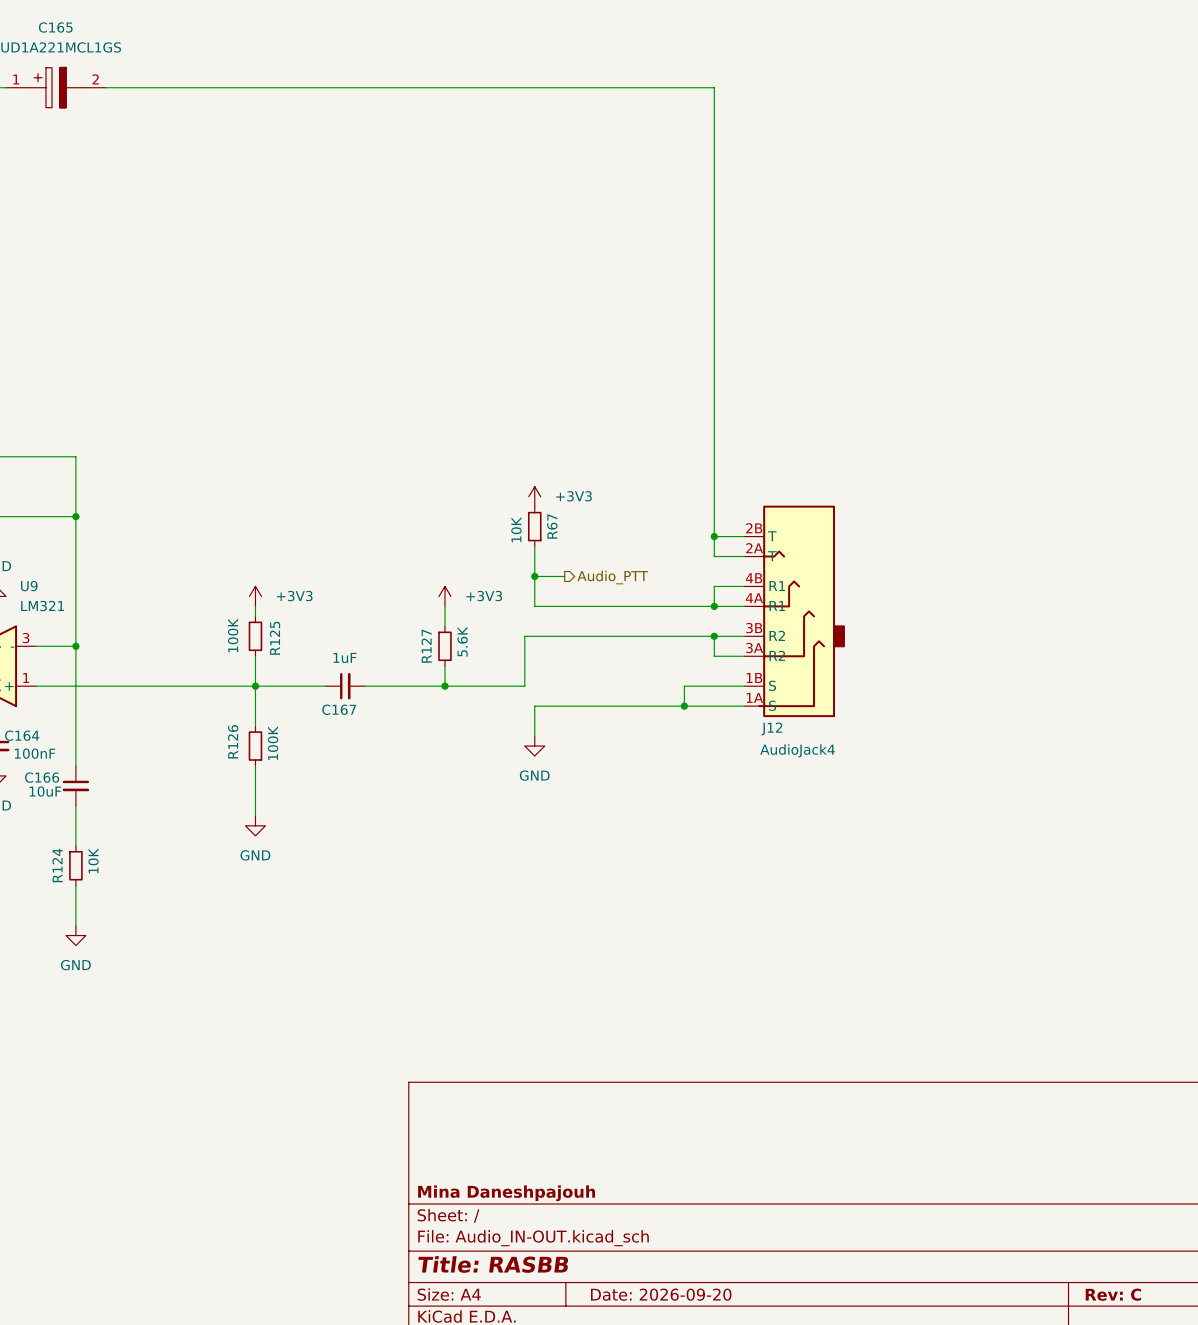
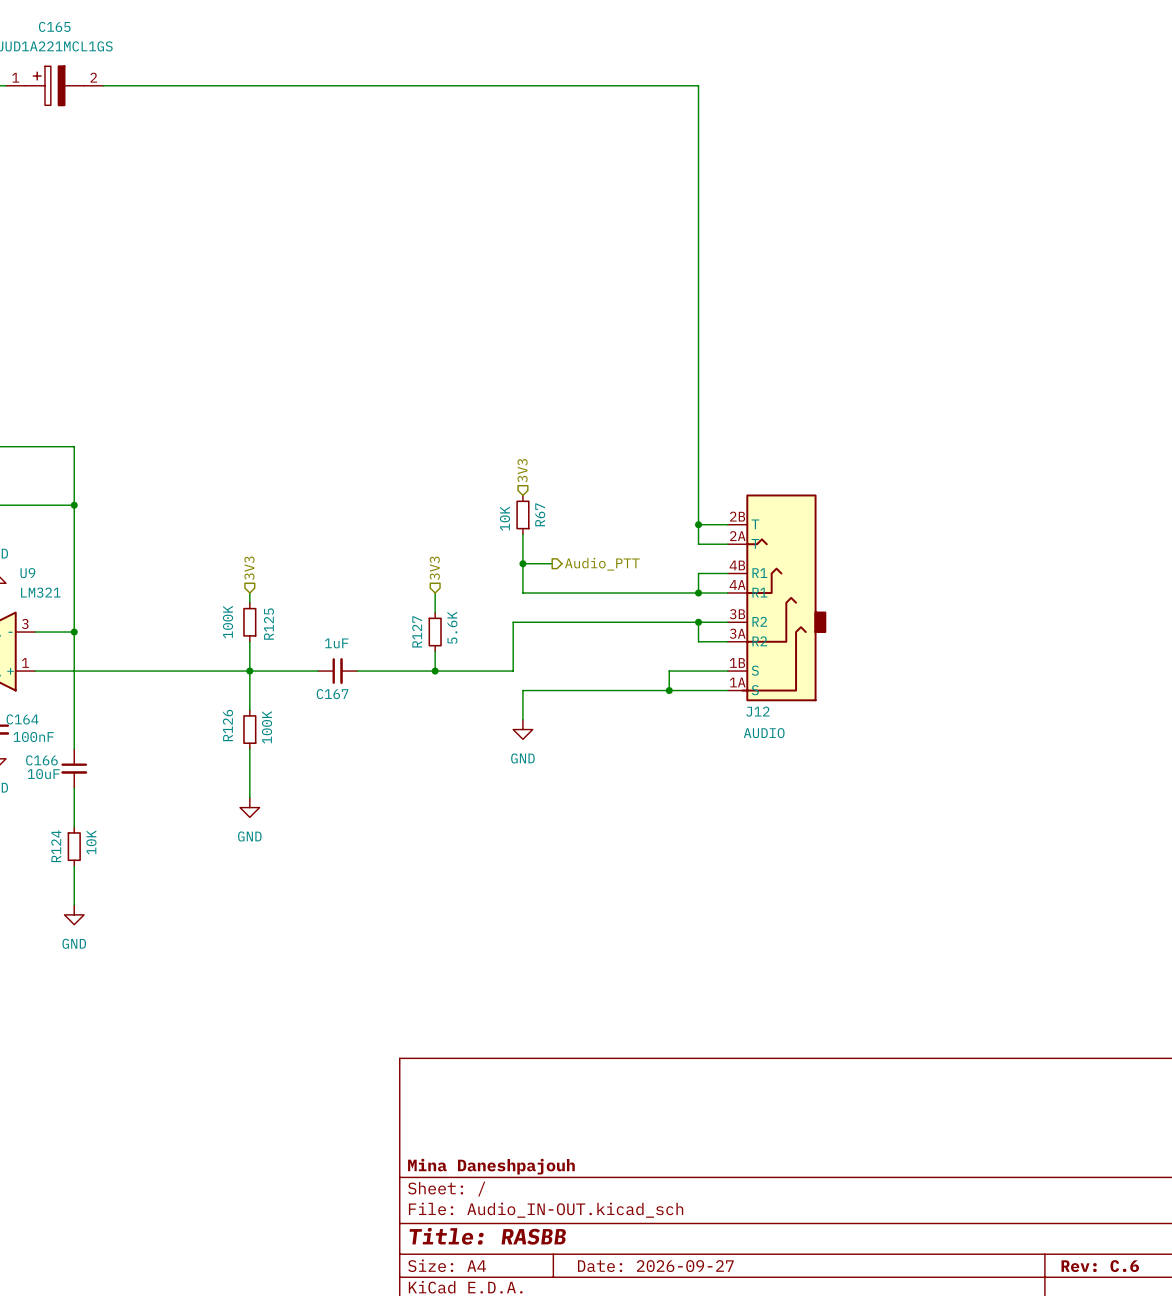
hierarchical label: none -> 3V3 (522, 470)
power symbol: +3V3 (534, 496) -> none
hierarchical label: none -> 3V3 (249, 568)
hierarchical label: none -> 3V3 (434, 568)
power symbol: +3V3 (255, 596) -> none
power symbol: +3V3 (444, 596) -> none
J12 value: AudioJack4 (797, 750) -> AUDIO (764, 733)
title block: Date: 2026-09-20 (661, 1294) -> Date: 2026-09-27 (655, 1266)
title block: Rev: C (1113, 1294) -> Rev: C.6 (1100, 1266)

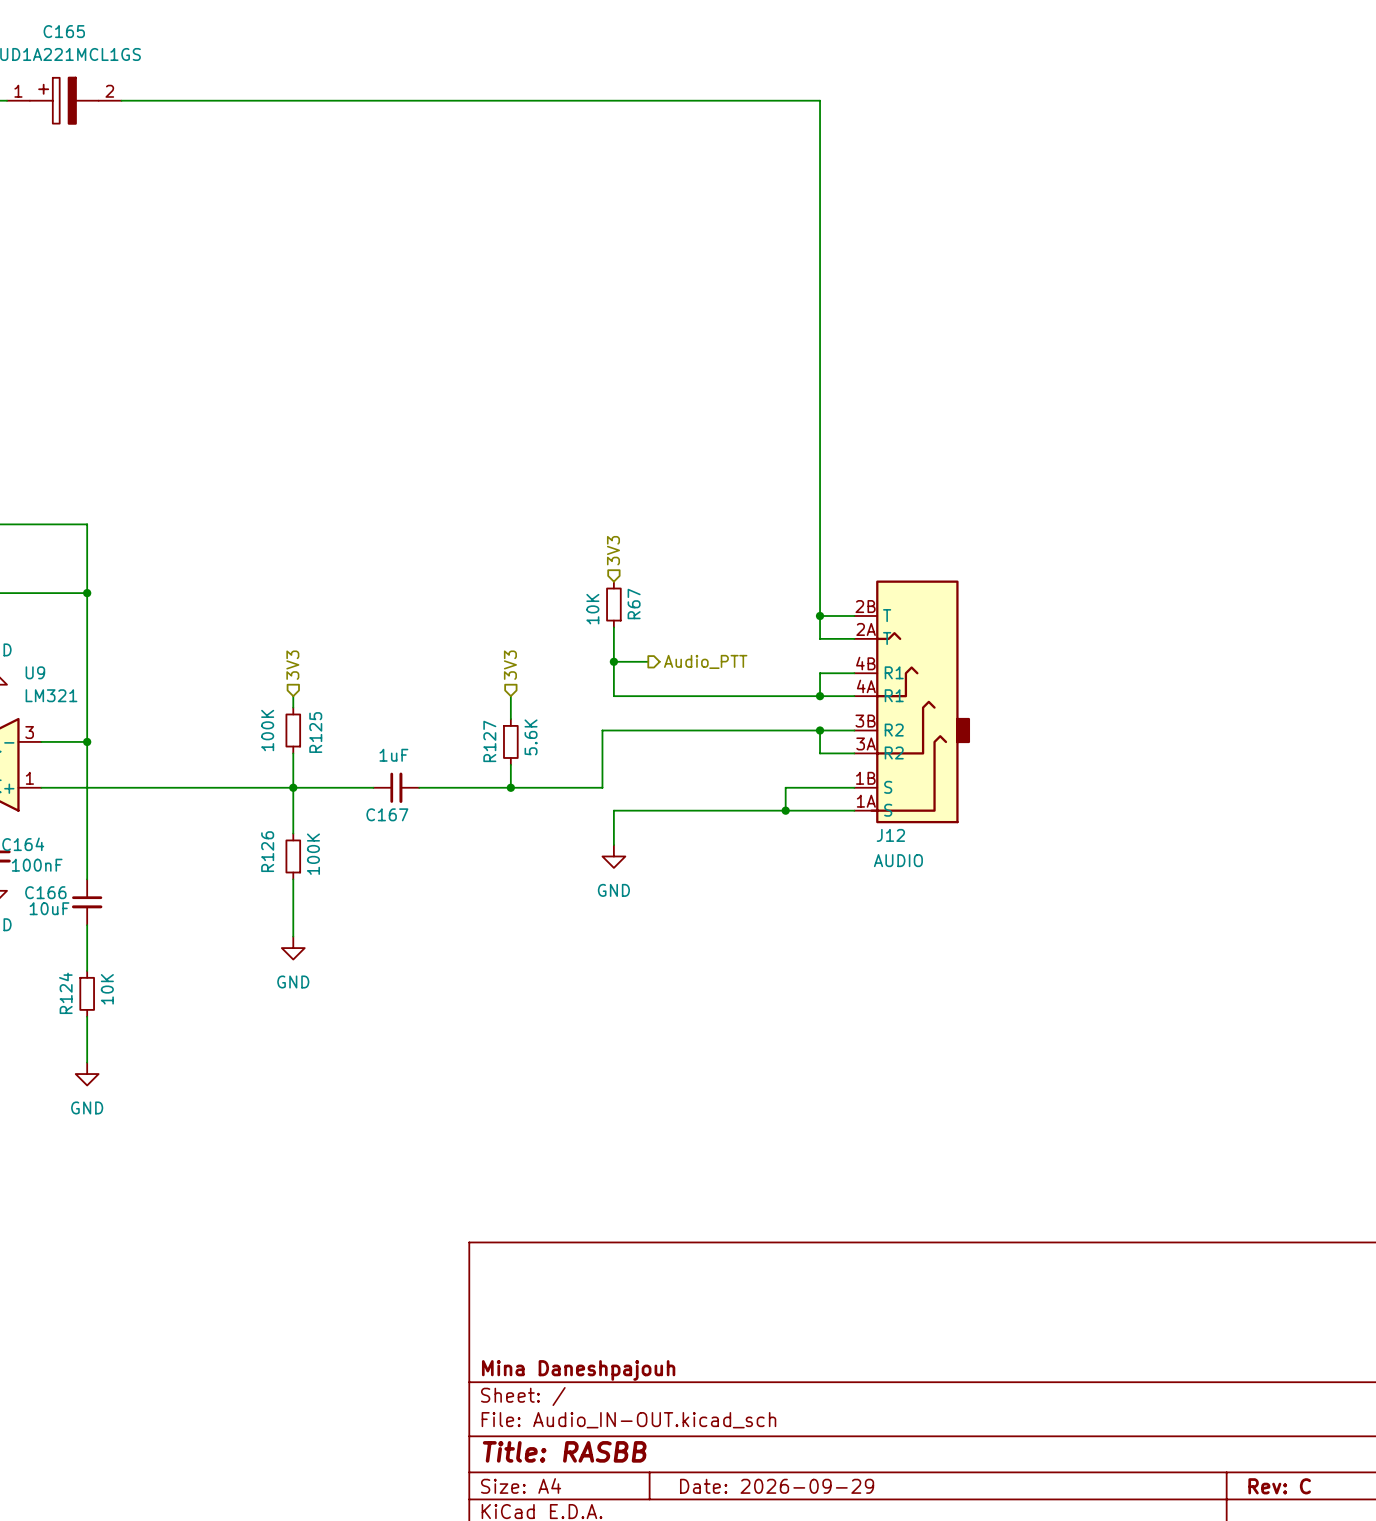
title block: Date: 2026-09-27 (655, 1266) -> Date: 2026-09-29 (777, 1486)
title block: Rev: C.6 (1100, 1266) -> Rev: C (1279, 1486)

